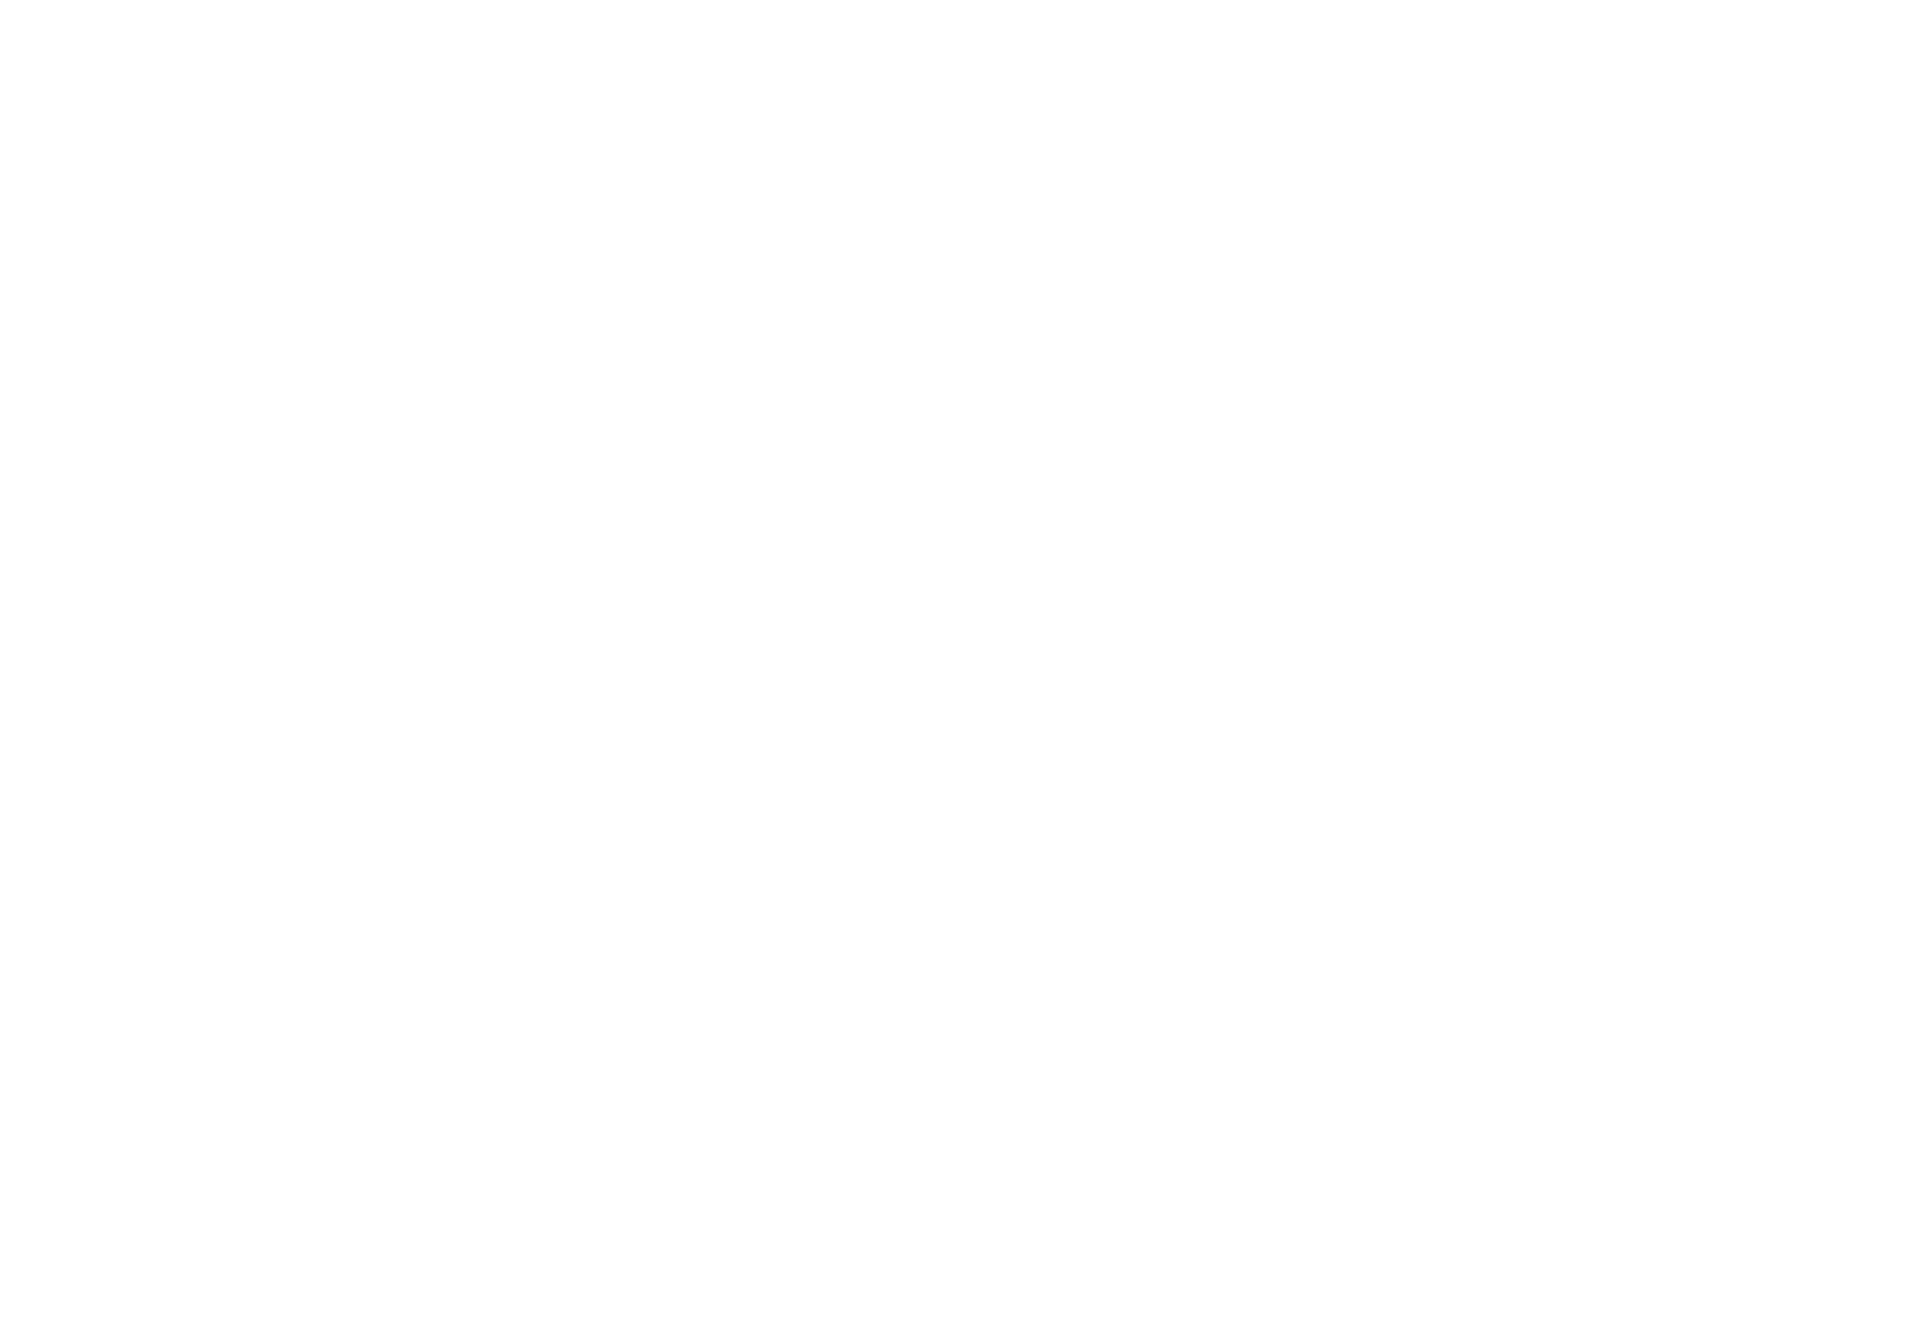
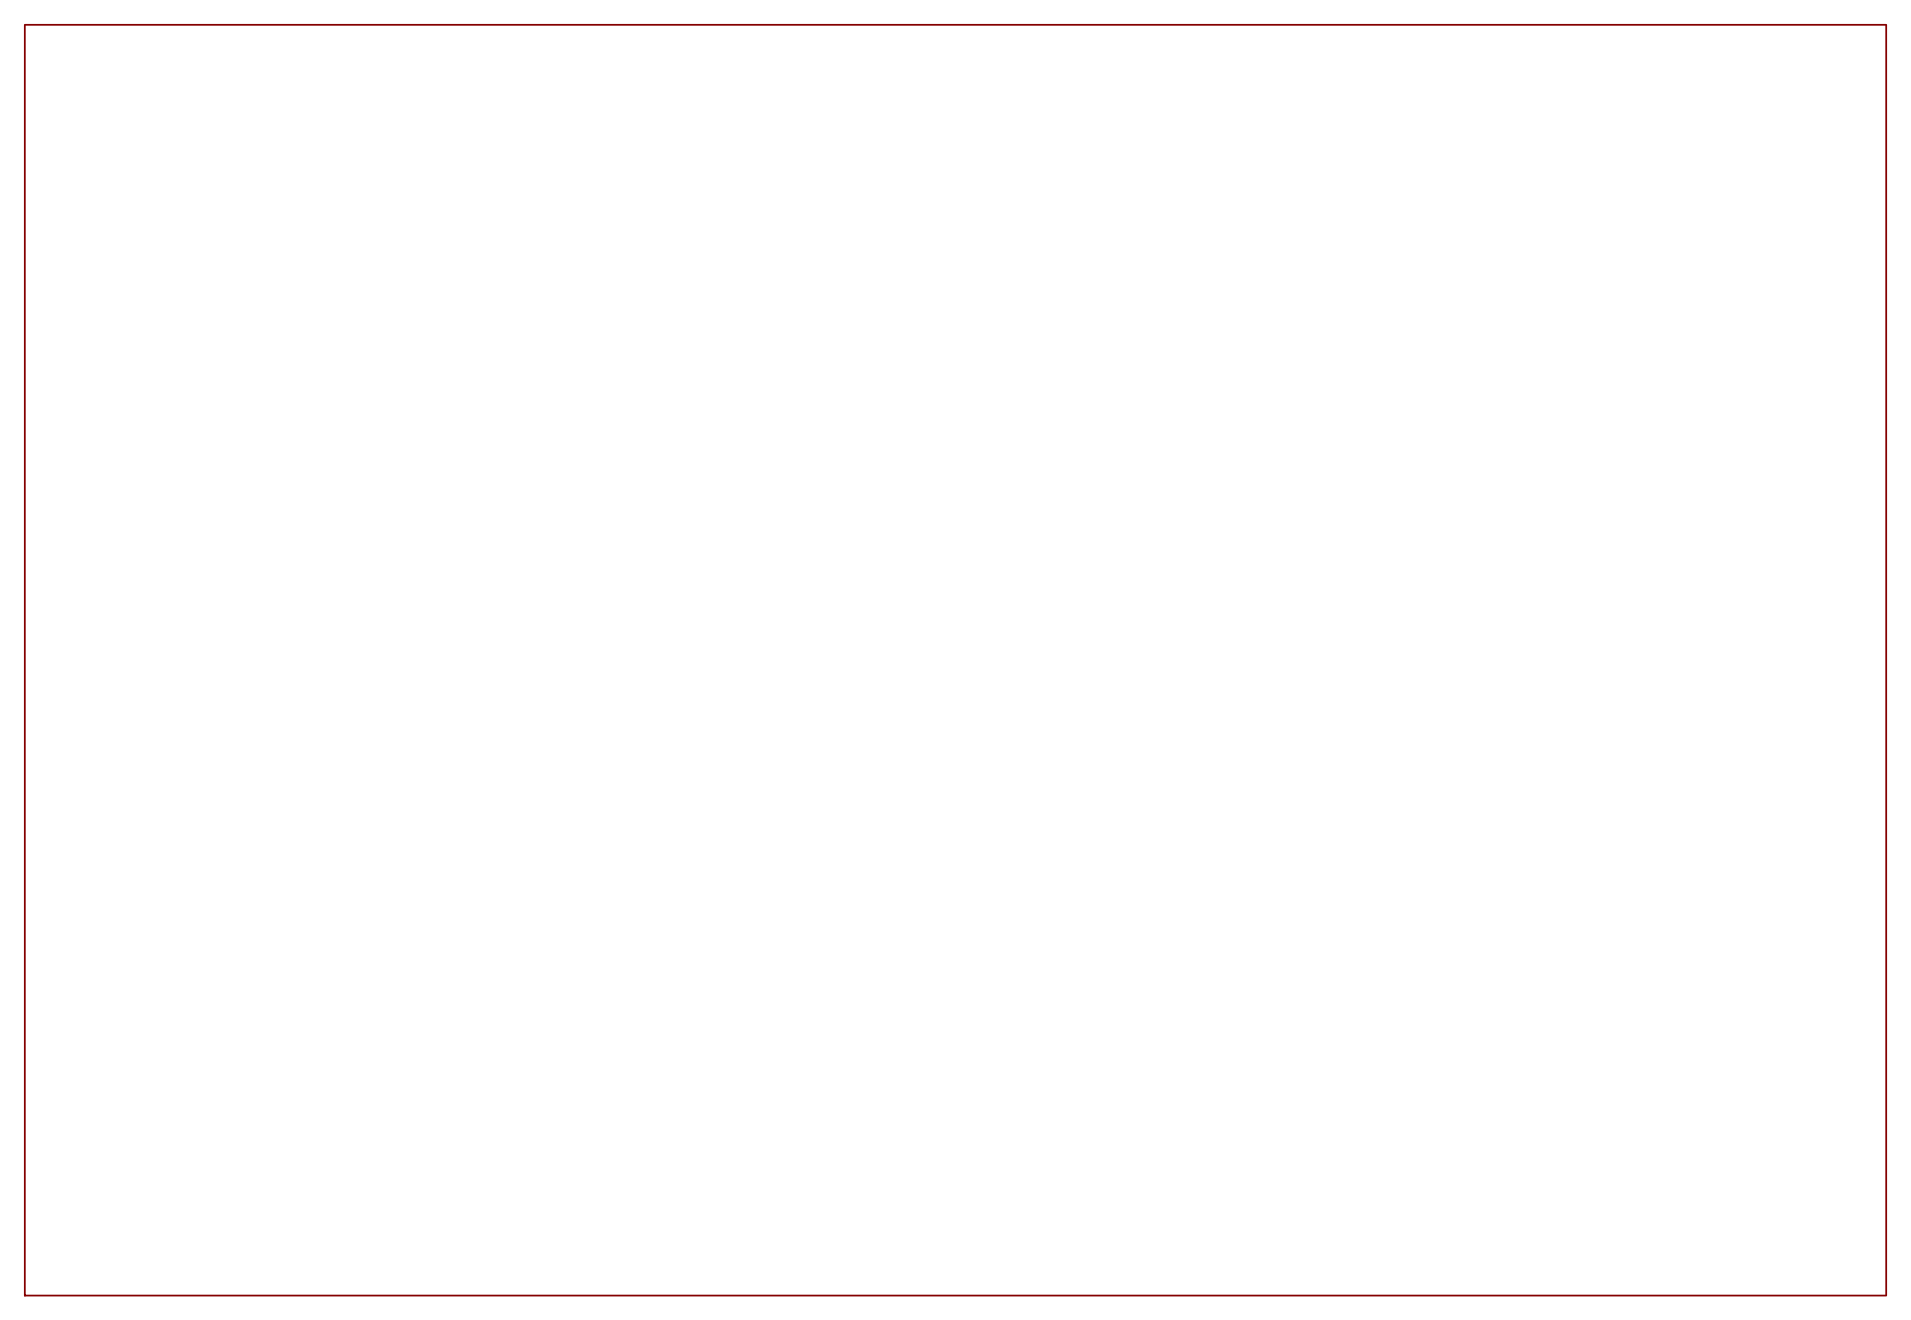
power symbol: none -> (955, 660)

